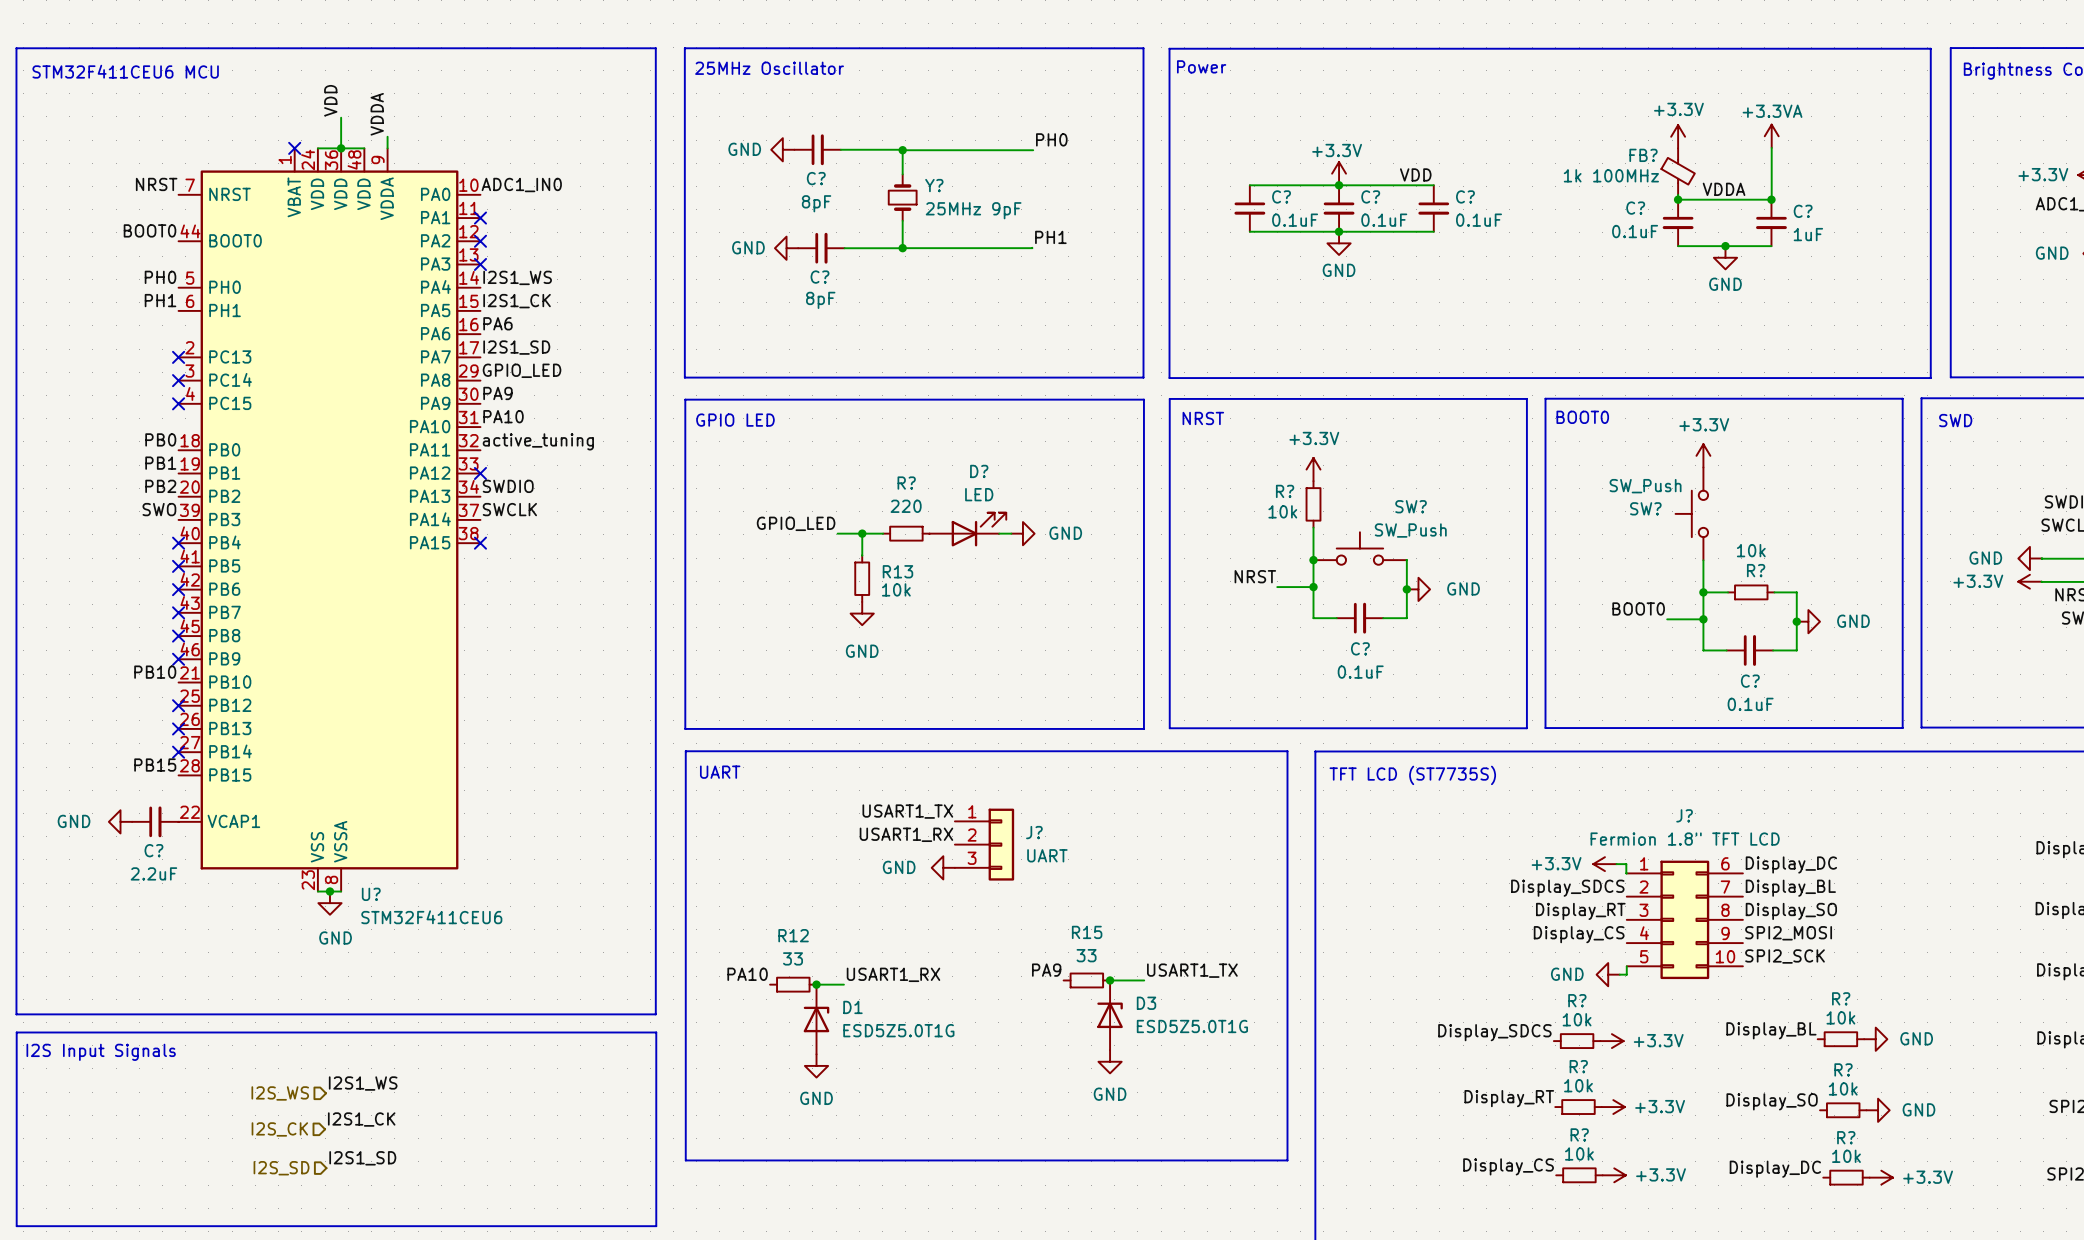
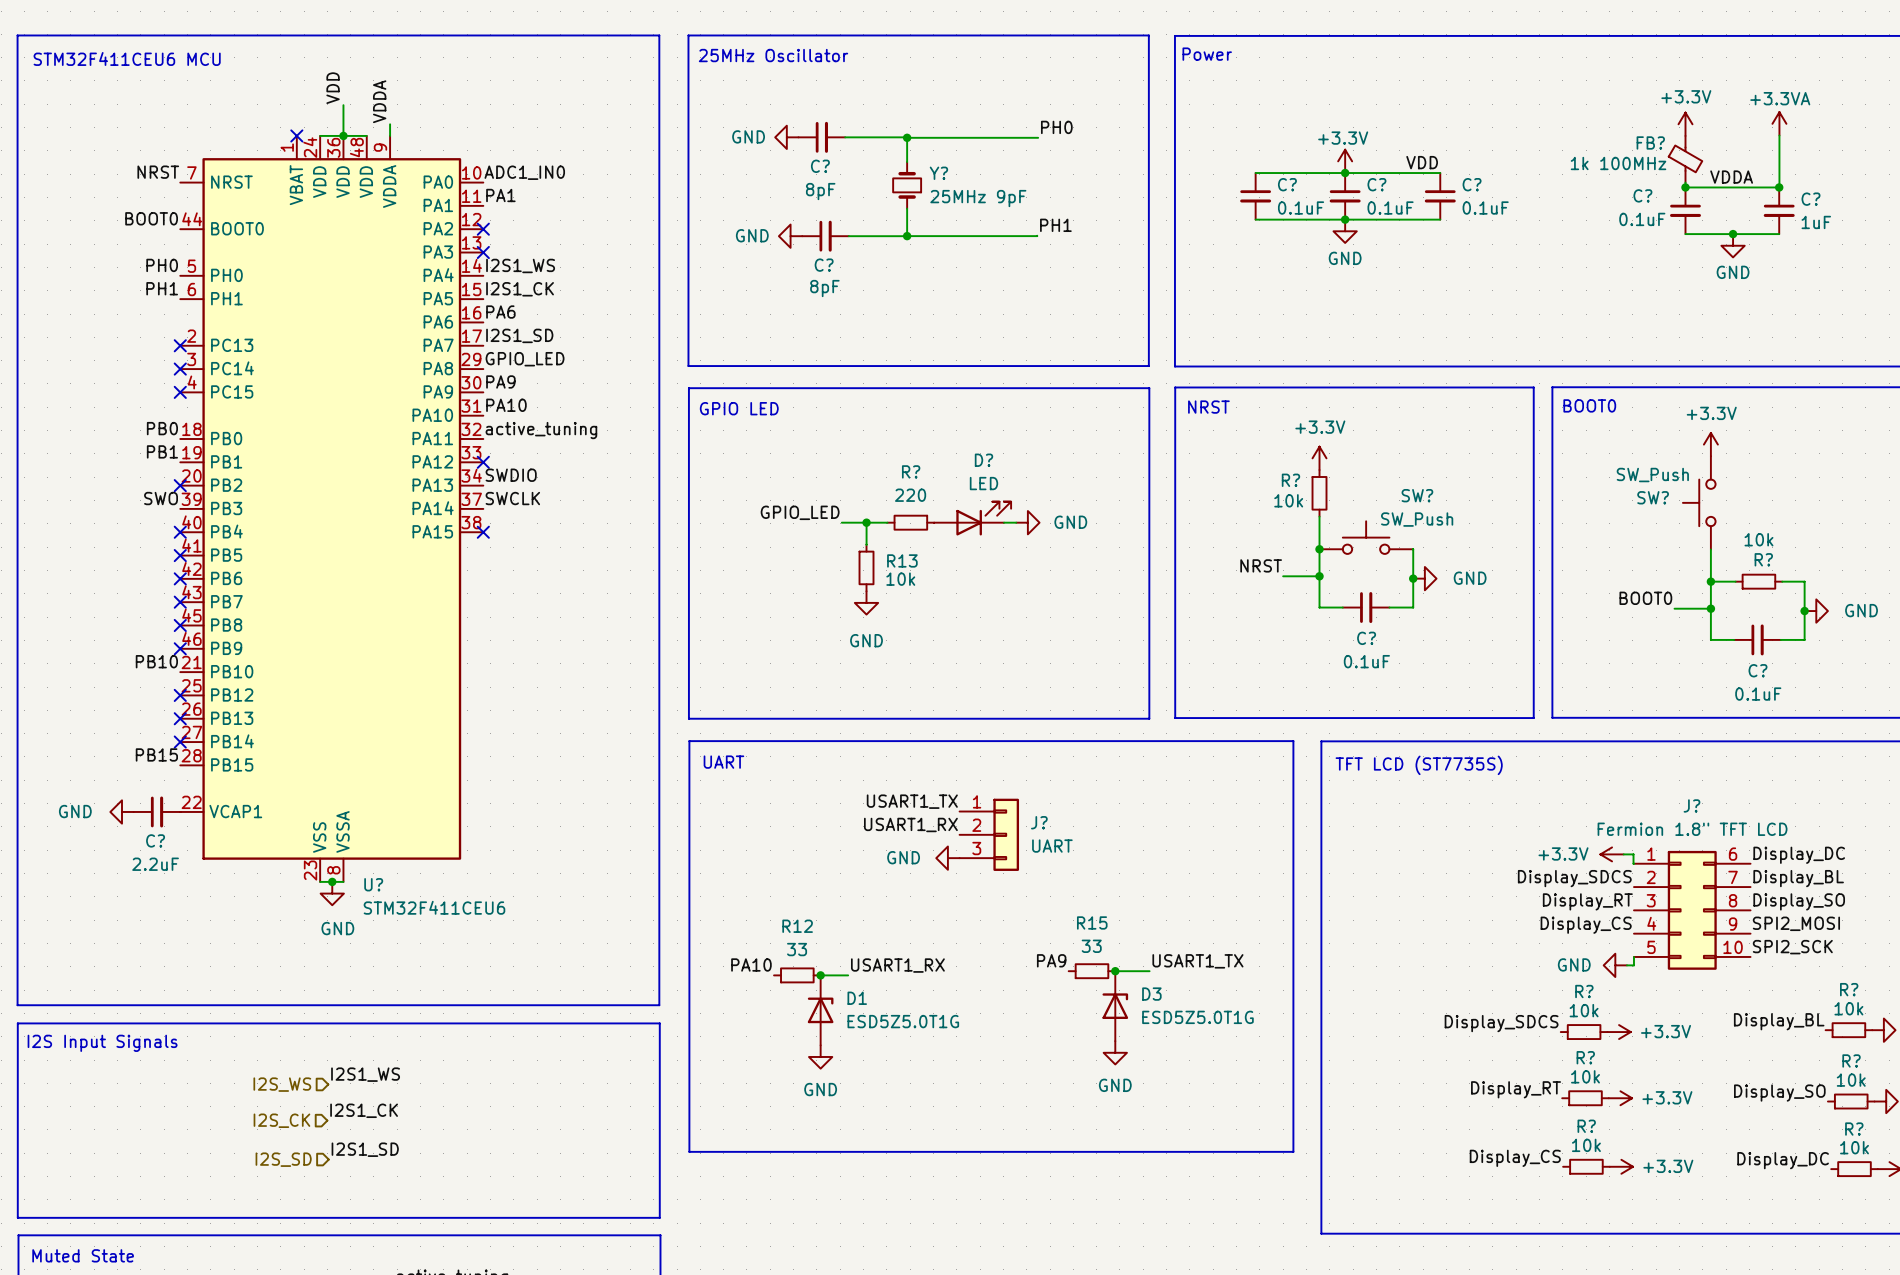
label: none -> PA1 (500, 195)
no-connect mark: (480, 218) -> none
label: PB2 (160, 486) -> none
no-connect mark: none -> (180, 485)

